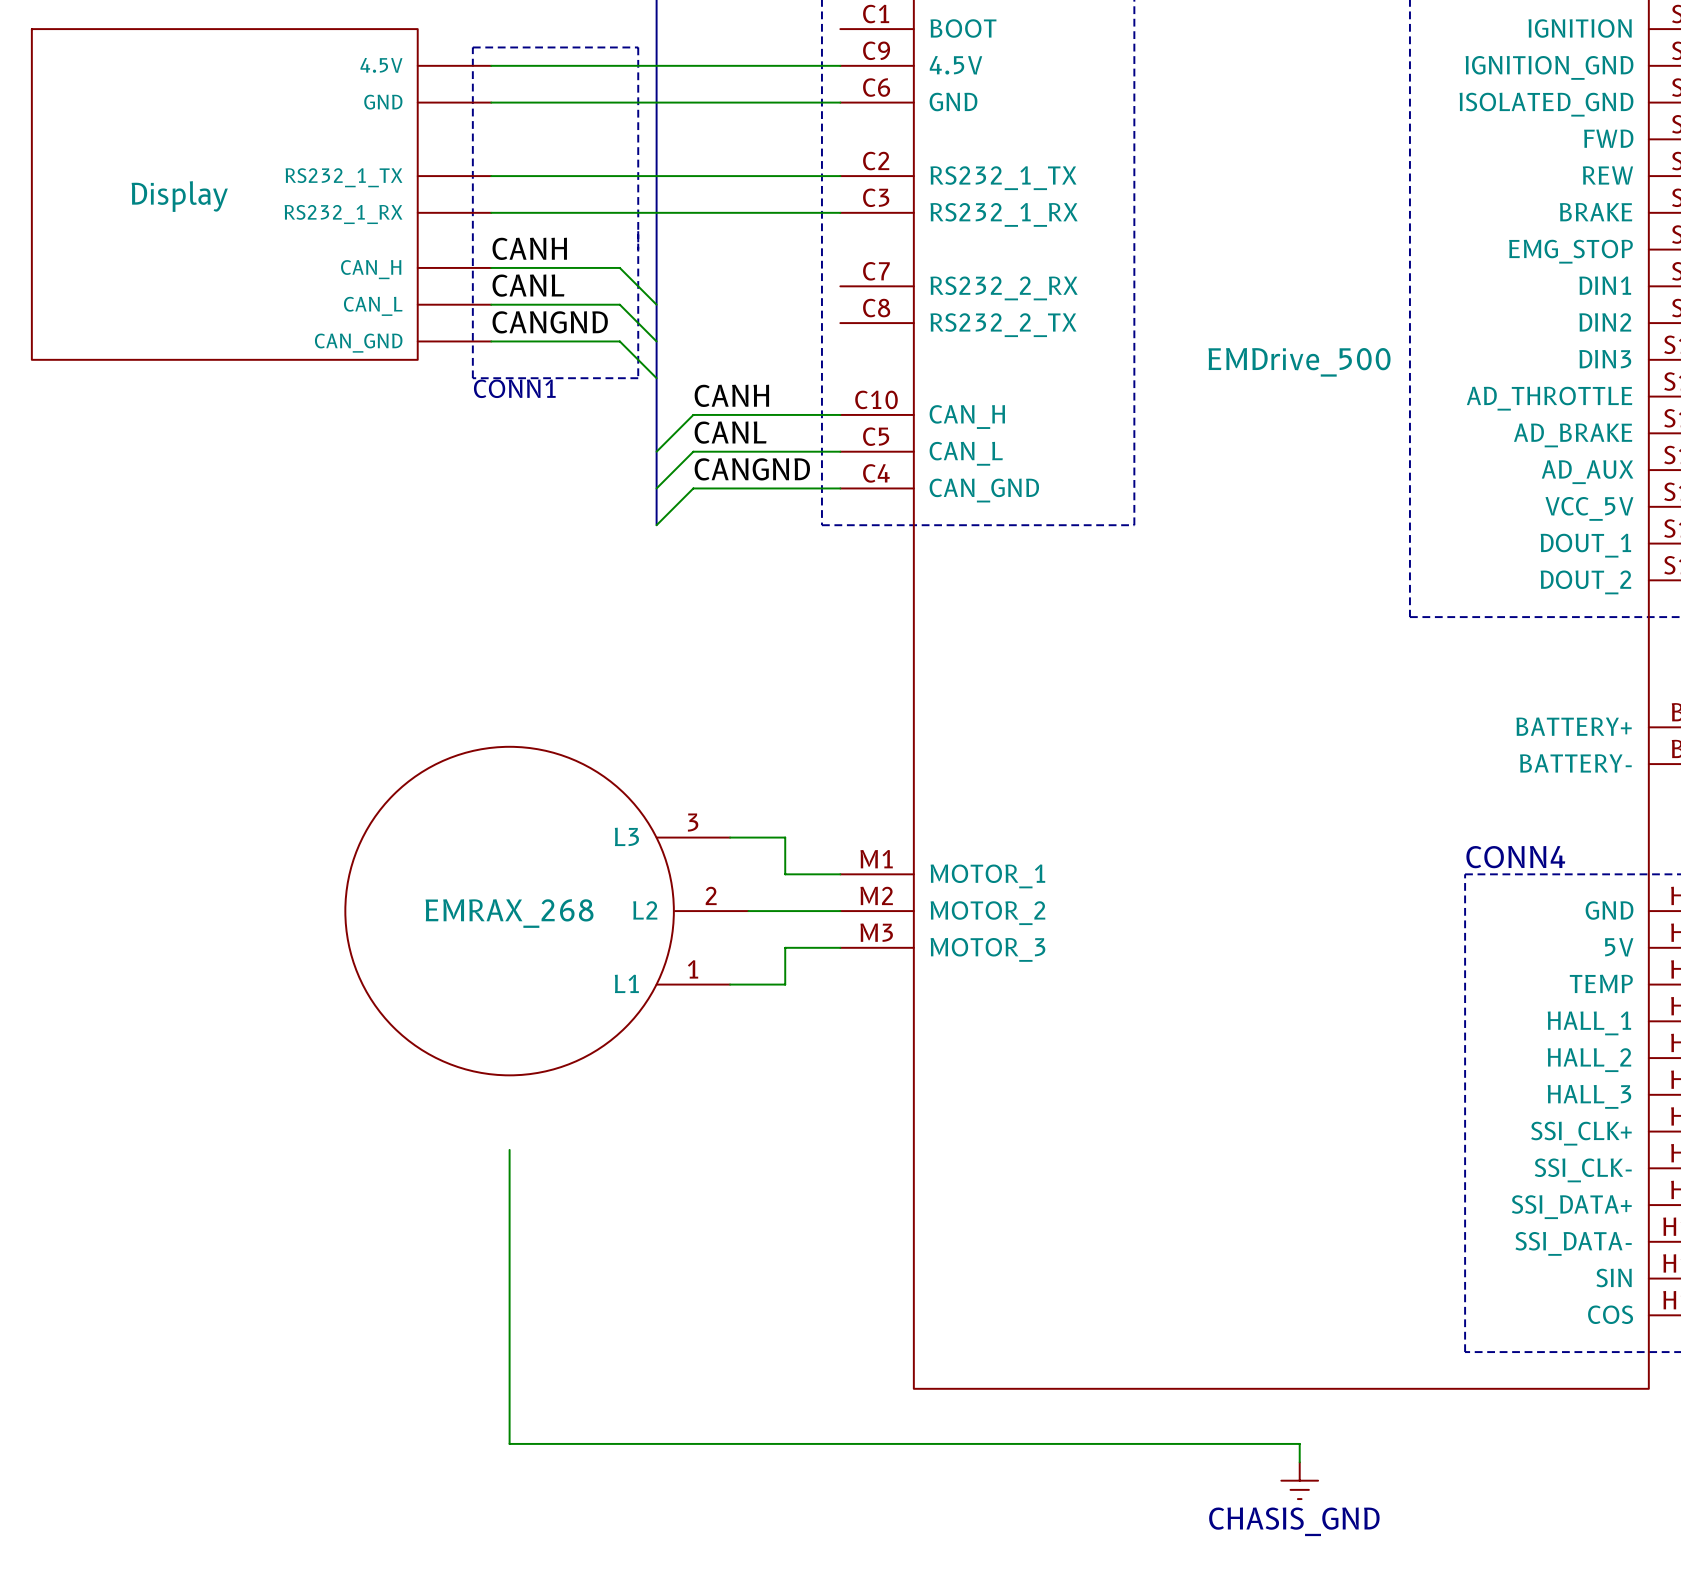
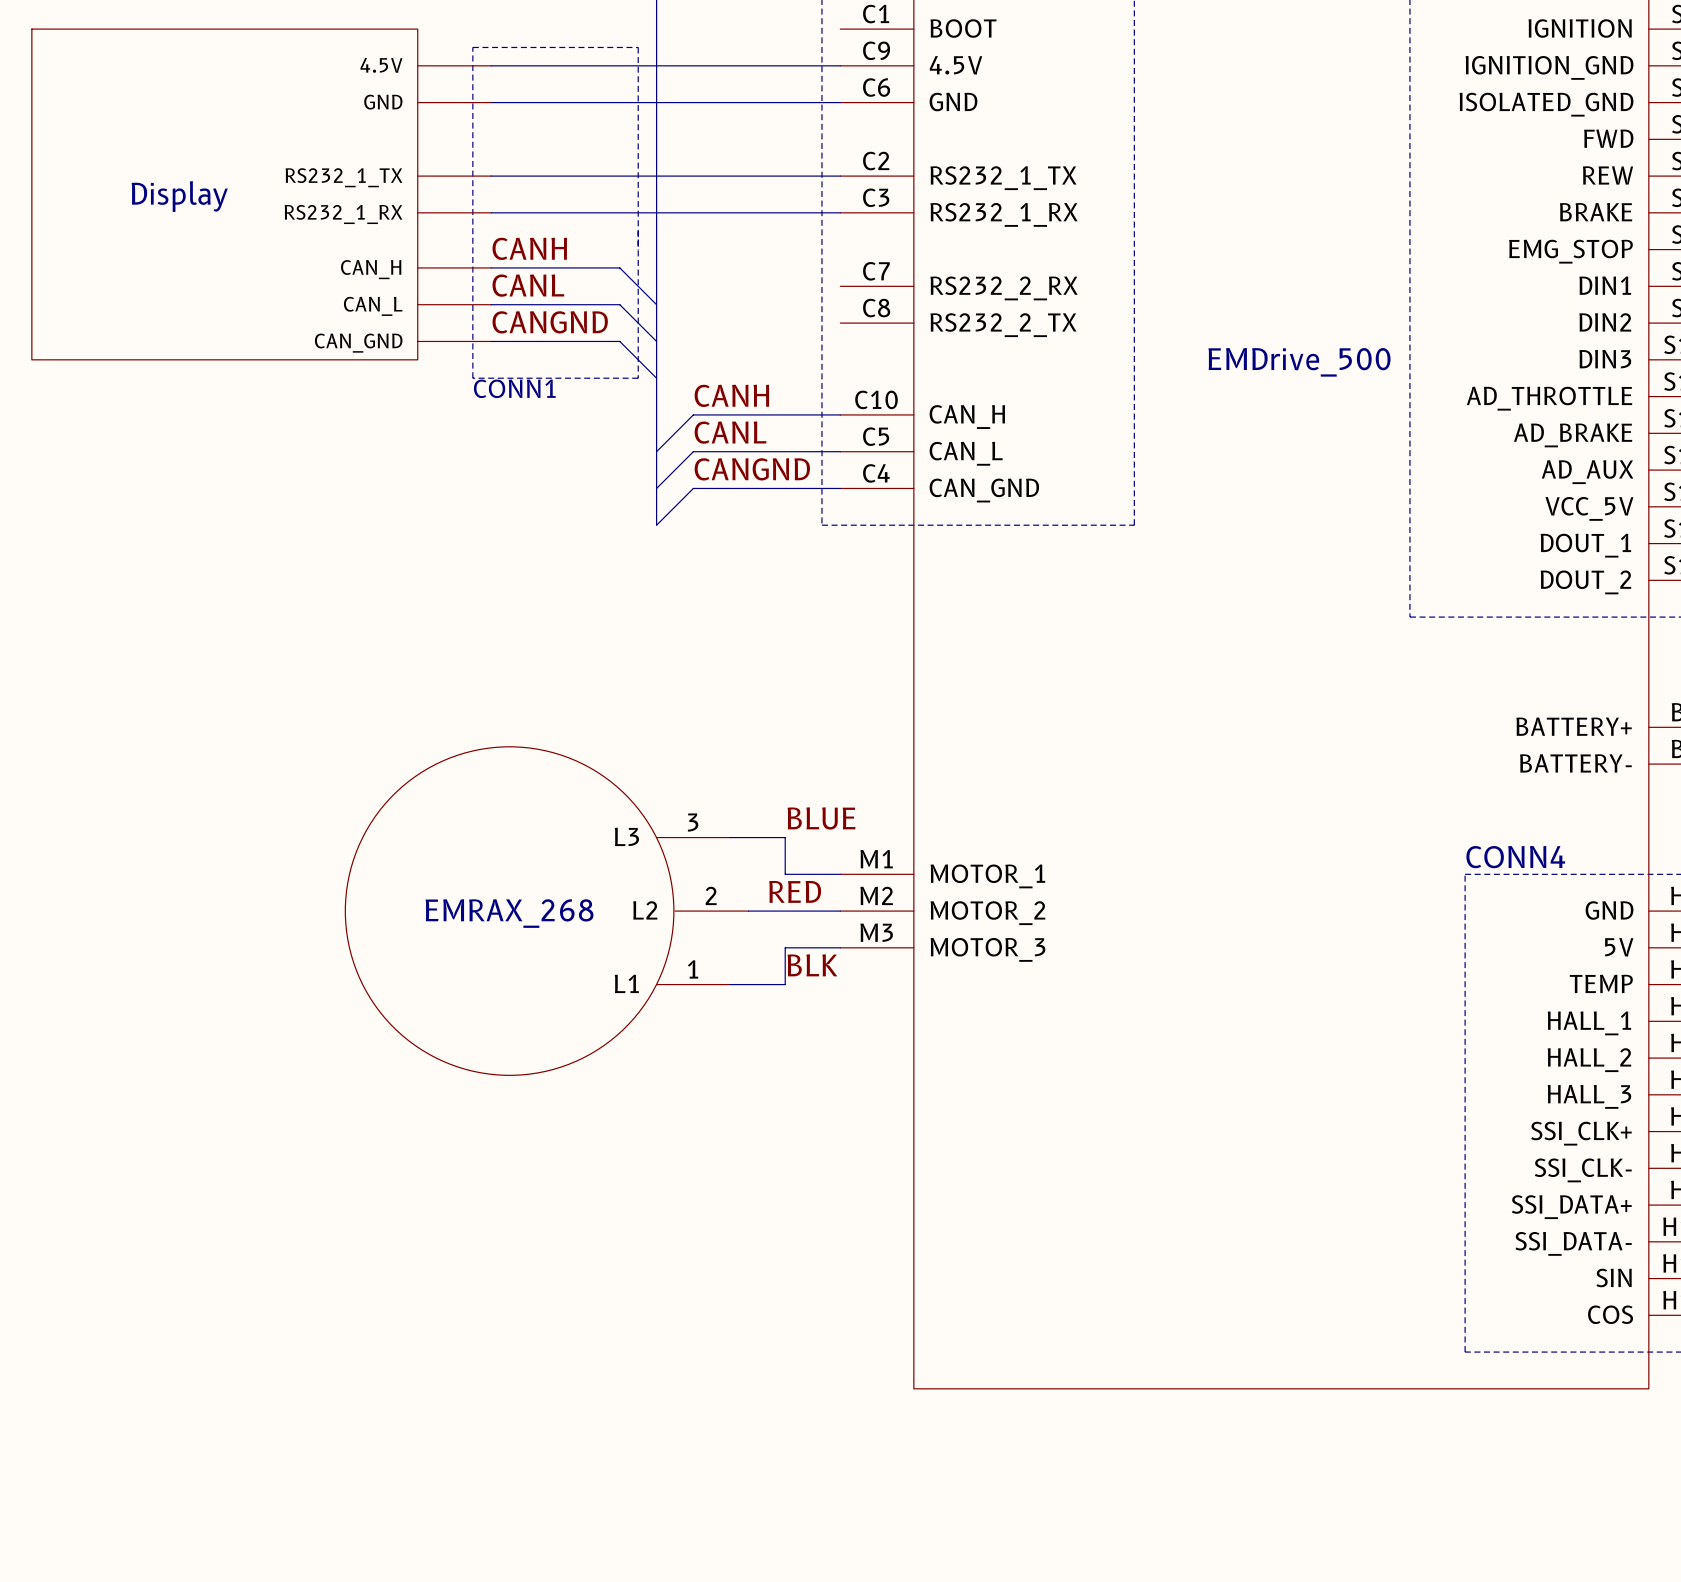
label: none -> BLUE (821, 818)
label: none -> RED (795, 891)
label: none -> BLK (812, 965)
wire: (509, 1149) (509, 1443) (1299, 1443) (1299, 1462) -> none
power symbol: (1299, 1480) -> none
text: CHASIS_GND (1294, 1521) -> none

